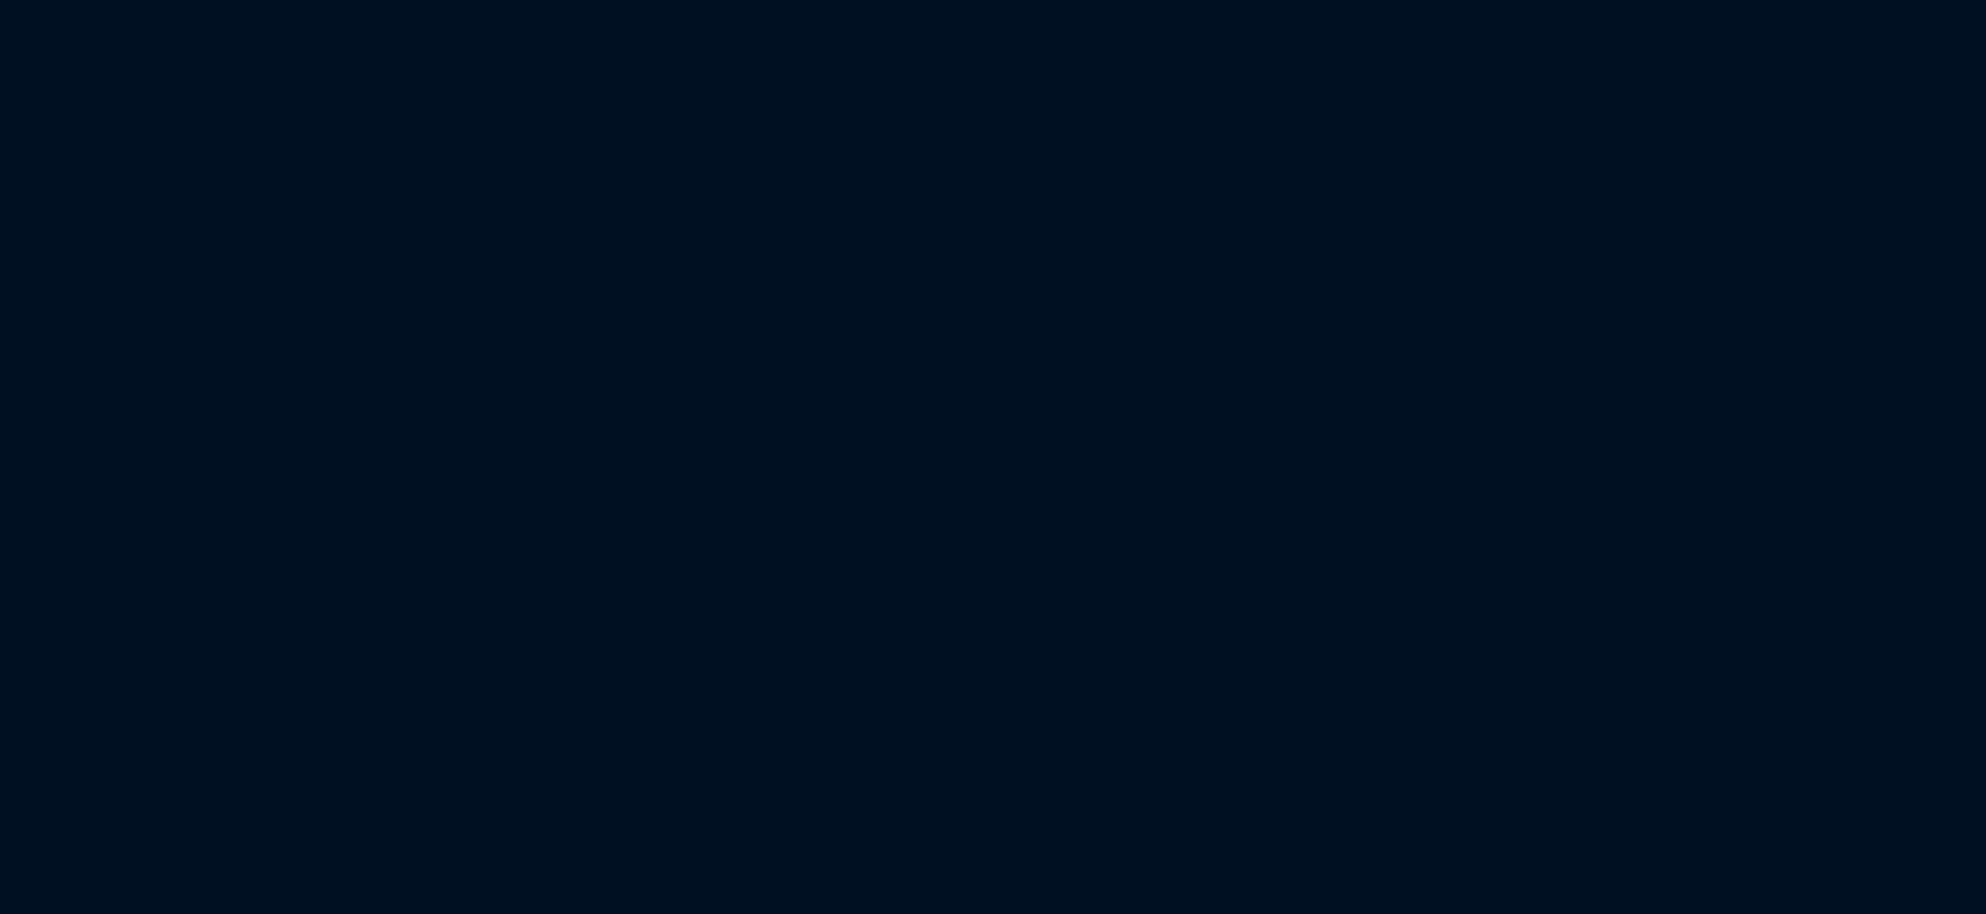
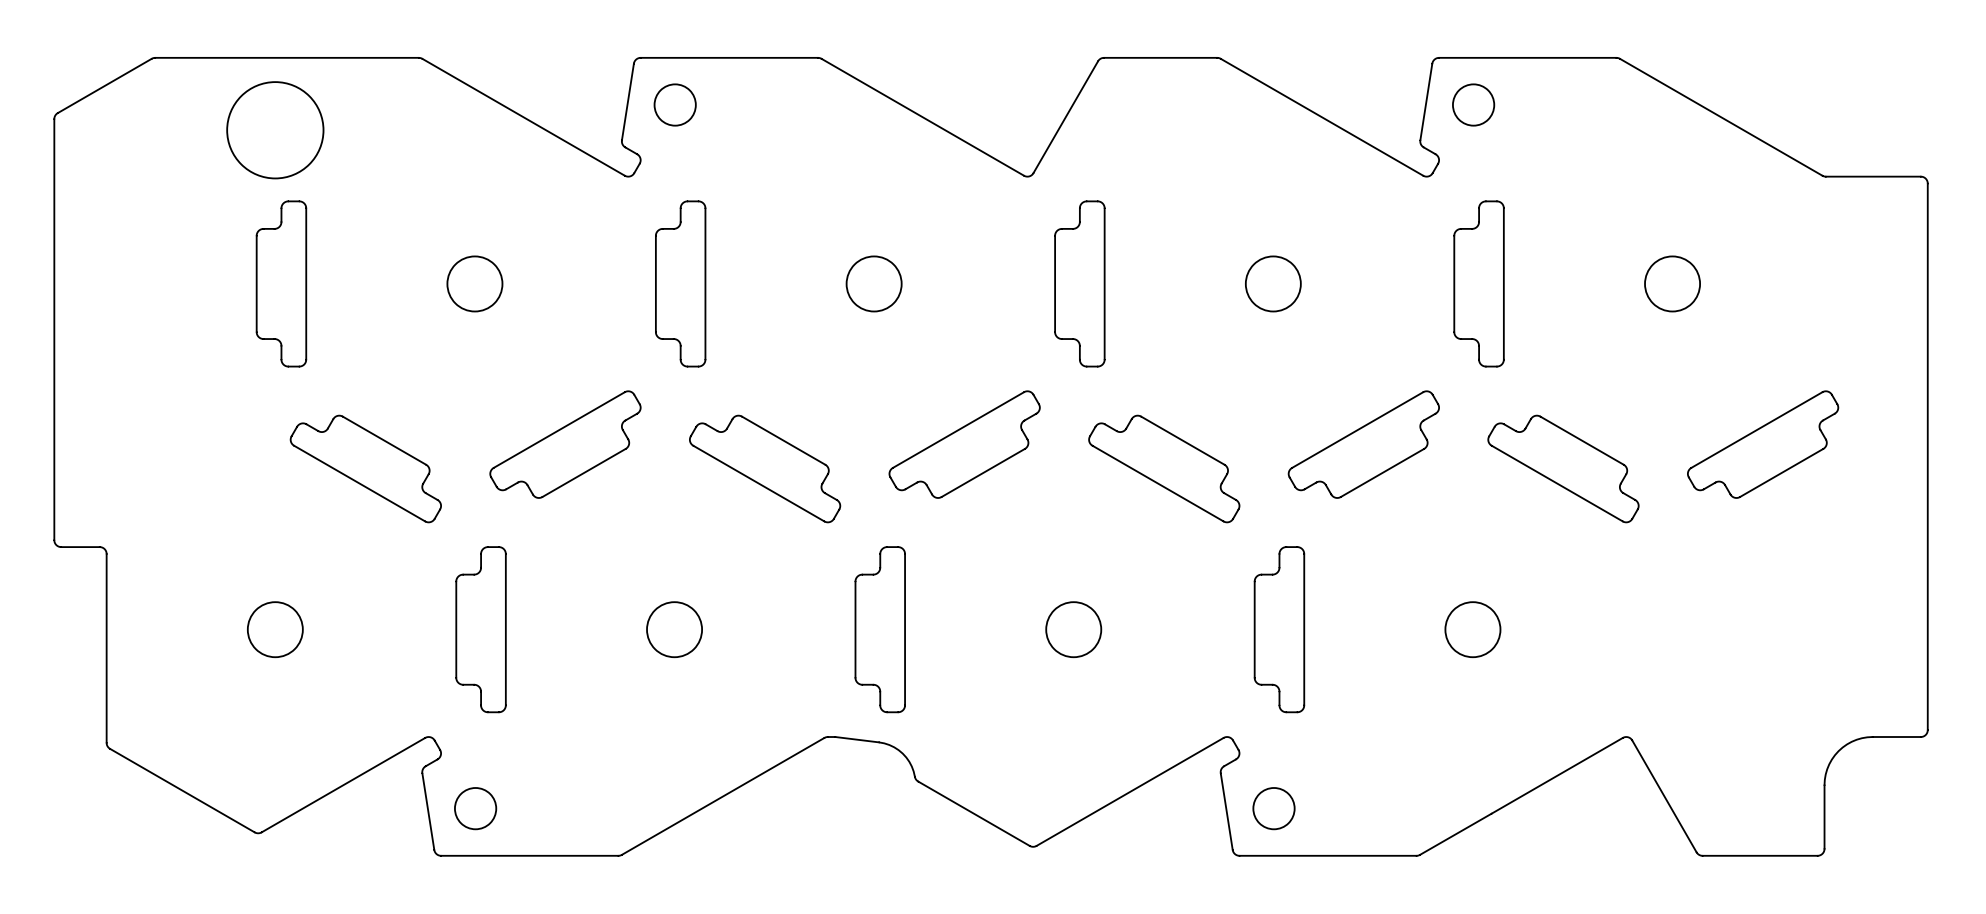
board edge: none -> (155, 57) (420, 58) (628, 176) (633, 173) (640, 160) (639, 155) (624, 146) (621, 141) (633, 63) (639, 57) (819, 58) (1027, 176) (1033, 173) (1098, 61) (1102, 58) (1219, 58) (1426, 176) (1432, 173) (1439, 160) (1436, 155) (1423, 146) (1420, 142) (1432, 63) (1435, 59) (1619, 58) (1823, 176) (1920, 176) (1927, 180) (1927, 732) (1921, 736) (1861, 738) (1847, 744) (1835, 755) (1825, 774) (1824, 849) (1822, 853) (1817, 855) (1699, 854) (1632, 740) (1626, 737) (1417, 855) (1235, 854) (1232, 849) (1220, 771) (1223, 766) (1237, 758) (1239, 752) (1232, 739) (1227, 737) (1034, 846) (917, 781) (909, 761) (894, 747) (879, 742) (835, 737) (824, 737) (619, 855) (437, 854) (434, 849) (422, 771) (425, 766) (438, 758) (441, 752) (434, 739) (428, 737) (261, 832) (256, 832) (107, 746) (106, 552) (100, 547) (59, 546) (54, 541) (54, 117) (57, 113) (155, 57)
round board edge: none -> [226, 81, 324, 179]
round board edge: none -> [654, 84, 697, 127]
round board edge: none -> [1452, 84, 1495, 127]
board edge: none -> (288, 201) (301, 201) (306, 207) (306, 359) (304, 364) (300, 366) (284, 365) (281, 360) (280, 341) (275, 339) (260, 338) (256, 333) (256, 234) (261, 229) (279, 226) (281, 205) (288, 201)
board edge: none -> (687, 201) (700, 201) (705, 207) (705, 359) (703, 364) (699, 366) (683, 365) (680, 360) (679, 341) (674, 339) (660, 338) (655, 333) (656, 234) (660, 229) (678, 226) (681, 205) (687, 201)
board edge: none -> (1086, 201) (1099, 201) (1104, 207) (1104, 359) (1102, 364) (1098, 366) (1082, 365) (1079, 360) (1078, 341) (1073, 339) (1059, 338) (1055, 333) (1055, 234) (1060, 229) (1077, 226) (1080, 205) (1086, 201)
board edge: none -> (1485, 201) (1498, 201) (1503, 207) (1503, 359) (1501, 364) (1497, 366) (1481, 365) (1479, 360) (1477, 341) (1473, 339) (1458, 338) (1454, 333) (1454, 234) (1459, 229) (1477, 226) (1479, 205) (1485, 201)
round board edge: none -> [447, 256, 503, 312]
round board edge: none -> [846, 256, 903, 312]
round board edge: none -> [1245, 256, 1302, 312]
round board edge: none -> [1644, 256, 1701, 312]
board edge: none -> (624, 392) (493, 468) (490, 475) (497, 487) (503, 490) (523, 481) (534, 495) (540, 497) (626, 448) (629, 442) (622, 429) (622, 423) (638, 412) (640, 407) (632, 392) (624, 392)
board edge: none -> (1024, 392) (892, 468) (889, 475) (896, 487) (903, 490) (922, 481) (933, 495) (939, 497) (1025, 448) (1028, 442) (1021, 429) (1021, 423) (1037, 412) (1039, 407) (1031, 392) (1024, 392)
board edge: none -> (1423, 392) (1291, 468) (1288, 475) (1295, 487) (1302, 490) (1321, 481) (1332, 495) (1339, 497) (1424, 448) (1427, 442) (1420, 429) (1420, 423) (1436, 412) (1439, 407) (1431, 392) (1423, 392)
board edge: none -> (1822, 392) (1690, 468) (1688, 475) (1694, 487) (1701, 490) (1720, 481) (1731, 495) (1738, 497) (1824, 448) (1826, 442) (1820, 429) (1819, 423) (1836, 412) (1838, 407) (1830, 392) (1822, 392)
board edge: none -> (342, 416) (428, 466) (429, 472) (422, 484) (422, 489) (438, 500) (441, 505) (433, 520) (425, 521) (291, 442) (291, 437) (299, 424) (305, 423) (322, 432) (327, 429) (335, 417) (342, 416)
board edge: none -> (741, 416) (827, 466) (828, 472) (822, 484) (821, 489) (838, 500) (840, 505) (832, 520) (824, 521) (690, 442) (690, 437) (699, 424) (704, 423) (722, 432) (726, 429) (734, 417) (741, 416)
board edge: none -> (1141, 416) (1226, 466) (1227, 472) (1221, 484) (1221, 489) (1237, 500) (1239, 505) (1231, 520) (1223, 521) (1089, 442) (1089, 437) (1098, 424) (1103, 423) (1121, 432) (1125, 429) (1133, 417) (1141, 416)
board edge: none -> (1540, 416) (1625, 466) (1627, 472) (1620, 484) (1620, 489) (1636, 500) (1638, 505) (1630, 520) (1622, 521) (1489, 442) (1488, 437) (1497, 424) (1502, 423) (1520, 432) (1525, 429) (1532, 417) (1540, 416)
board edge: none -> (487, 547) (500, 547) (505, 553) (505, 705) (503, 710) (499, 712) (483, 710) (481, 706) (479, 687) (475, 684) (460, 684) (456, 678) (456, 579) (461, 574) (479, 572) (481, 551) (487, 547)
board edge: none -> (887, 547) (899, 547) (904, 553) (905, 705) (903, 710) (899, 712) (882, 710) (880, 706) (878, 687) (874, 684) (859, 684) (855, 678) (855, 579) (860, 574) (878, 572) (880, 551) (887, 547)
board edge: none -> (1286, 547) (1299, 547) (1304, 553) (1304, 705) (1302, 710) (1298, 712) (1282, 710) (1279, 706) (1278, 687) (1273, 684) (1258, 684) (1254, 678) (1254, 579) (1259, 574) (1277, 572) (1279, 551) (1286, 547)
round board edge: none -> [247, 601, 304, 658]
round board edge: none -> [646, 601, 703, 658]
round board edge: none -> [1045, 601, 1102, 658]
round board edge: none -> [1445, 601, 1501, 658]
round board edge: none -> [454, 787, 497, 830]
round board edge: none -> [1253, 787, 1296, 830]

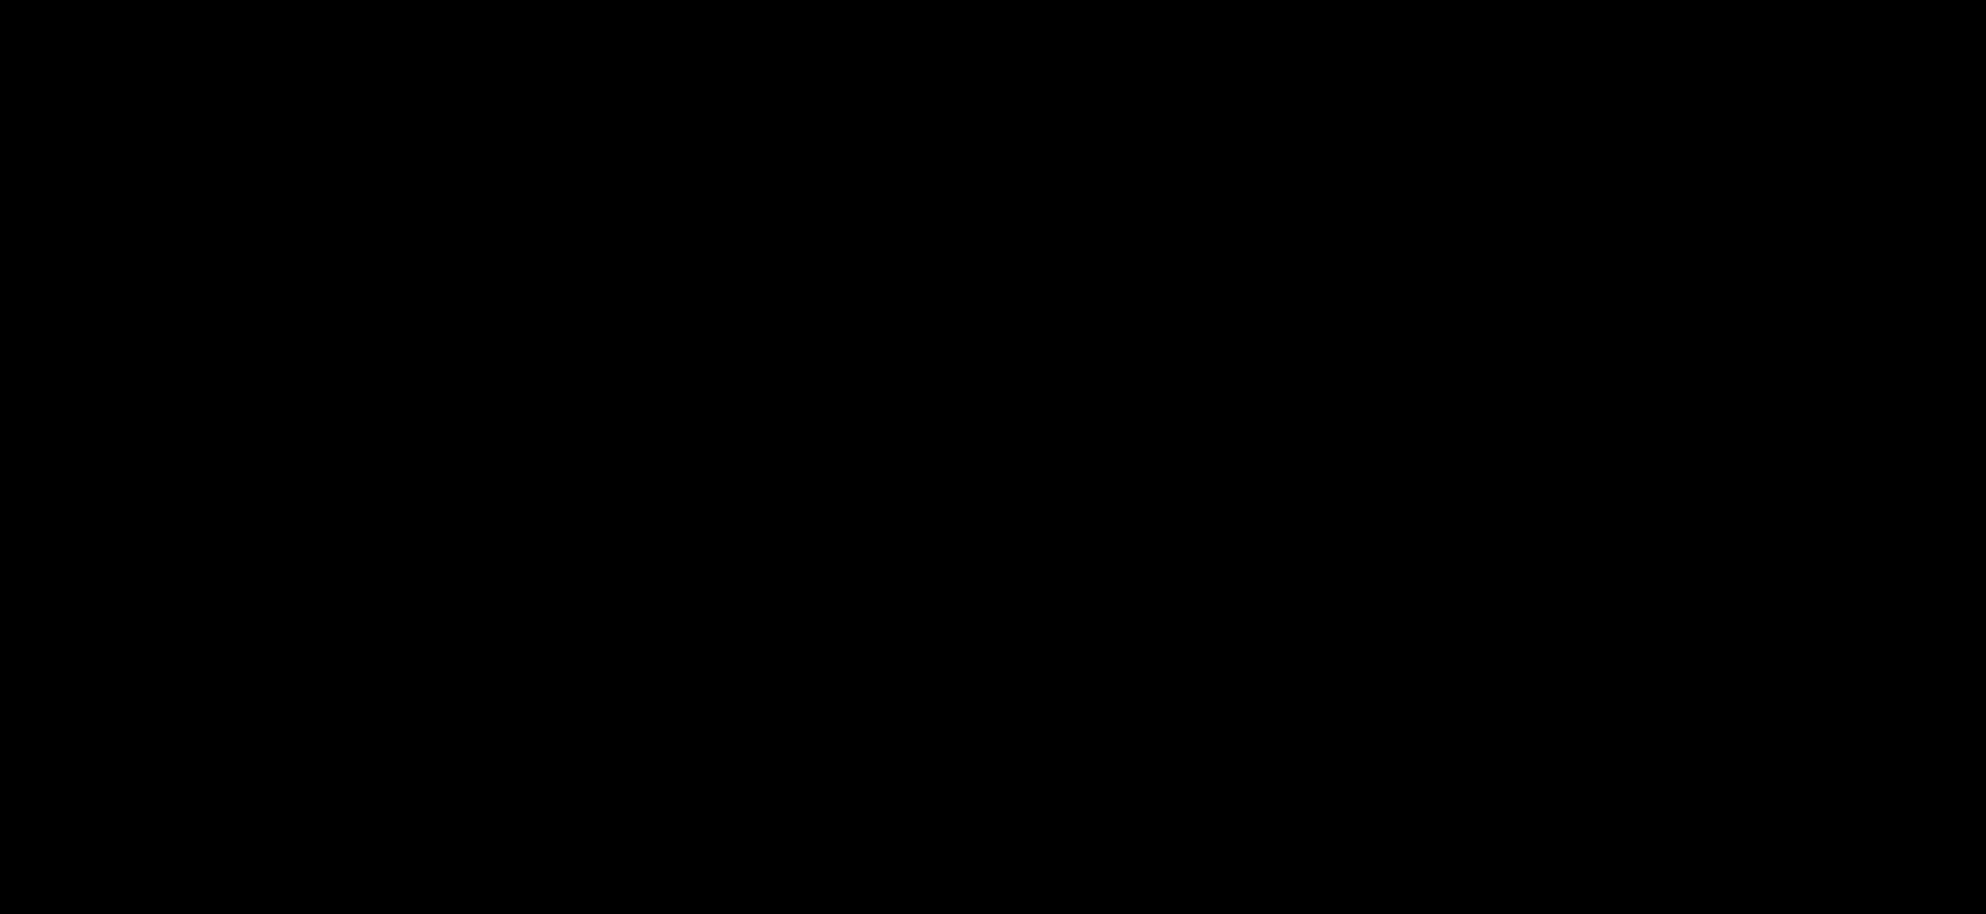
board edge: (155, 57) (420, 58) (628, 176) (633, 173) (640, 160) (639, 155) (624, 146) (621, 141) (633, 63) (639, 57) (819, 58) (1027, 176) (1033, 173) (1098, 61) (1102, 58) (1219, 58) (1426, 176) (1432, 173) (1439, 160) (1436, 155) (1423, 146) (1420, 142) (1432, 63) (1435, 59) (1619, 58) (1823, 176) (1920, 176) (1927, 180) (1927, 732) (1921, 736) (1861, 738) (1847, 744) (1835, 755) (1825, 774) (1824, 849) (1822, 853) (1817, 855) (1699, 854) (1632, 740) (1626, 737) (1417, 855) (1235, 854) (1232, 849) (1220, 771) (1223, 766) (1237, 758) (1239, 752) (1232, 739) (1227, 737) (1034, 846) (917, 781) (909, 761) (894, 747) (879, 742) (835, 737) (824, 737) (619, 855) (437, 854) (434, 849) (422, 771) (425, 766) (438, 758) (441, 752) (434, 739) (428, 737) (261, 832) (256, 832) (107, 746) (106, 552) (100, 547) (59, 546) (54, 541) (54, 117) (57, 113) (155, 57) -> none
round board edge: [226, 81, 324, 179] -> none
round board edge: [654, 84, 697, 127] -> none
round board edge: [1452, 84, 1495, 127] -> none
board edge: (288, 201) (301, 201) (306, 207) (306, 359) (304, 364) (300, 366) (284, 365) (281, 360) (280, 341) (275, 339) (260, 338) (256, 333) (256, 234) (261, 229) (279, 226) (281, 205) (288, 201) -> none
board edge: (687, 201) (700, 201) (705, 207) (705, 359) (703, 364) (699, 366) (683, 365) (680, 360) (679, 341) (674, 339) (660, 338) (655, 333) (656, 234) (660, 229) (678, 226) (681, 205) (687, 201) -> none
board edge: (1086, 201) (1099, 201) (1104, 207) (1104, 359) (1102, 364) (1098, 366) (1082, 365) (1079, 360) (1078, 341) (1073, 339) (1059, 338) (1055, 333) (1055, 234) (1060, 229) (1077, 226) (1080, 205) (1086, 201) -> none
board edge: (1485, 201) (1498, 201) (1503, 207) (1503, 359) (1501, 364) (1497, 366) (1481, 365) (1479, 360) (1477, 341) (1473, 339) (1458, 338) (1454, 333) (1454, 234) (1459, 229) (1477, 226) (1479, 205) (1485, 201) -> none
round board edge: [447, 256, 503, 312] -> none
round board edge: [846, 256, 903, 312] -> none
round board edge: [1245, 256, 1302, 312] -> none
round board edge: [1644, 256, 1701, 312] -> none
board edge: (624, 392) (493, 468) (490, 475) (497, 487) (503, 490) (523, 481) (534, 495) (540, 497) (626, 448) (629, 442) (622, 429) (622, 423) (638, 412) (640, 407) (632, 392) (624, 392) -> none
board edge: (1024, 392) (892, 468) (889, 475) (896, 487) (903, 490) (922, 481) (933, 495) (939, 497) (1025, 448) (1028, 442) (1021, 429) (1021, 423) (1037, 412) (1039, 407) (1031, 392) (1024, 392) -> none
board edge: (1423, 392) (1291, 468) (1288, 475) (1295, 487) (1302, 490) (1321, 481) (1332, 495) (1339, 497) (1424, 448) (1427, 442) (1420, 429) (1420, 423) (1436, 412) (1439, 407) (1431, 392) (1423, 392) -> none
board edge: (1822, 392) (1690, 468) (1688, 475) (1694, 487) (1701, 490) (1720, 481) (1731, 495) (1738, 497) (1824, 448) (1826, 442) (1820, 429) (1819, 423) (1836, 412) (1838, 407) (1830, 392) (1822, 392) -> none
board edge: (342, 416) (428, 466) (429, 472) (422, 484) (422, 489) (438, 500) (441, 505) (433, 520) (425, 521) (291, 442) (291, 437) (299, 424) (305, 423) (322, 432) (327, 429) (335, 417) (342, 416) -> none
board edge: (741, 416) (827, 466) (828, 472) (822, 484) (821, 489) (838, 500) (840, 505) (832, 520) (824, 521) (690, 442) (690, 437) (699, 424) (704, 423) (722, 432) (726, 429) (734, 417) (741, 416) -> none
board edge: (1141, 416) (1226, 466) (1227, 472) (1221, 484) (1221, 489) (1237, 500) (1239, 505) (1231, 520) (1223, 521) (1089, 442) (1089, 437) (1098, 424) (1103, 423) (1121, 432) (1125, 429) (1133, 417) (1141, 416) -> none
board edge: (1540, 416) (1625, 466) (1627, 472) (1620, 484) (1620, 489) (1636, 500) (1638, 505) (1630, 520) (1622, 521) (1489, 442) (1488, 437) (1497, 424) (1502, 423) (1520, 432) (1525, 429) (1532, 417) (1540, 416) -> none
board edge: (487, 547) (500, 547) (505, 553) (505, 705) (503, 710) (499, 712) (483, 710) (481, 706) (479, 687) (475, 684) (460, 684) (456, 678) (456, 579) (461, 574) (479, 572) (481, 551) (487, 547) -> none
board edge: (887, 547) (899, 547) (904, 553) (905, 705) (903, 710) (899, 712) (882, 710) (880, 706) (878, 687) (874, 684) (859, 684) (855, 678) (855, 579) (860, 574) (878, 572) (880, 551) (887, 547) -> none
board edge: (1286, 547) (1299, 547) (1304, 553) (1304, 705) (1302, 710) (1298, 712) (1282, 710) (1279, 706) (1278, 687) (1273, 684) (1258, 684) (1254, 678) (1254, 579) (1259, 574) (1277, 572) (1279, 551) (1286, 547) -> none
round board edge: [247, 601, 304, 658] -> none
round board edge: [646, 601, 703, 658] -> none
round board edge: [1045, 601, 1102, 658] -> none
round board edge: [1445, 601, 1501, 658] -> none
round board edge: [454, 787, 497, 830] -> none
round board edge: [1253, 787, 1296, 830] -> none

